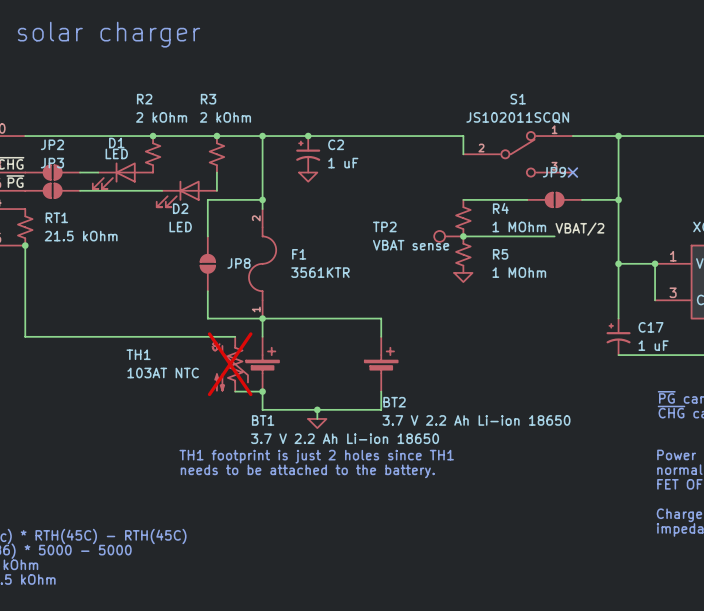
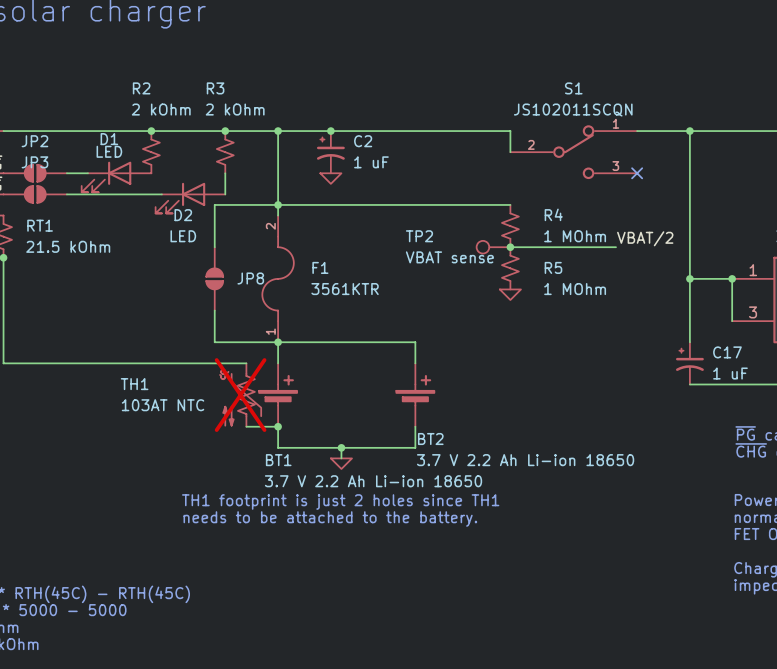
wire: (463, 199) (527, 199) -> (510, 204) (278, 204)
JP9: (554, 199) -> none
wire: (582, 199) (618, 199) -> none
junction: (618, 199) -> none

